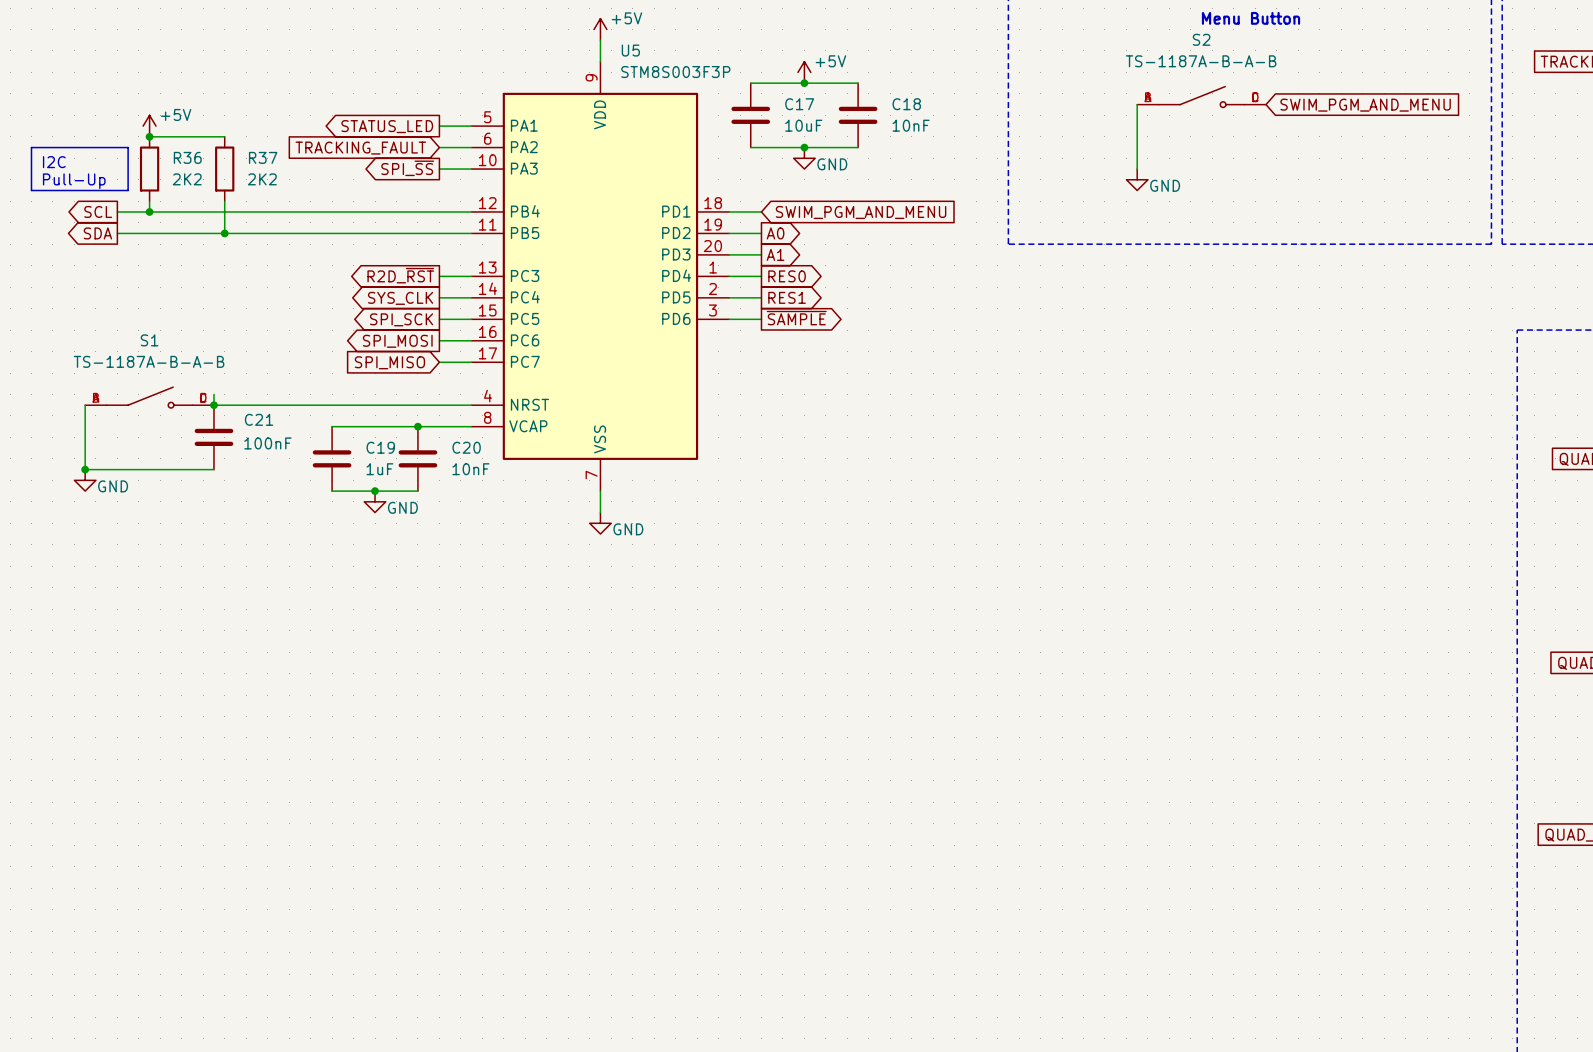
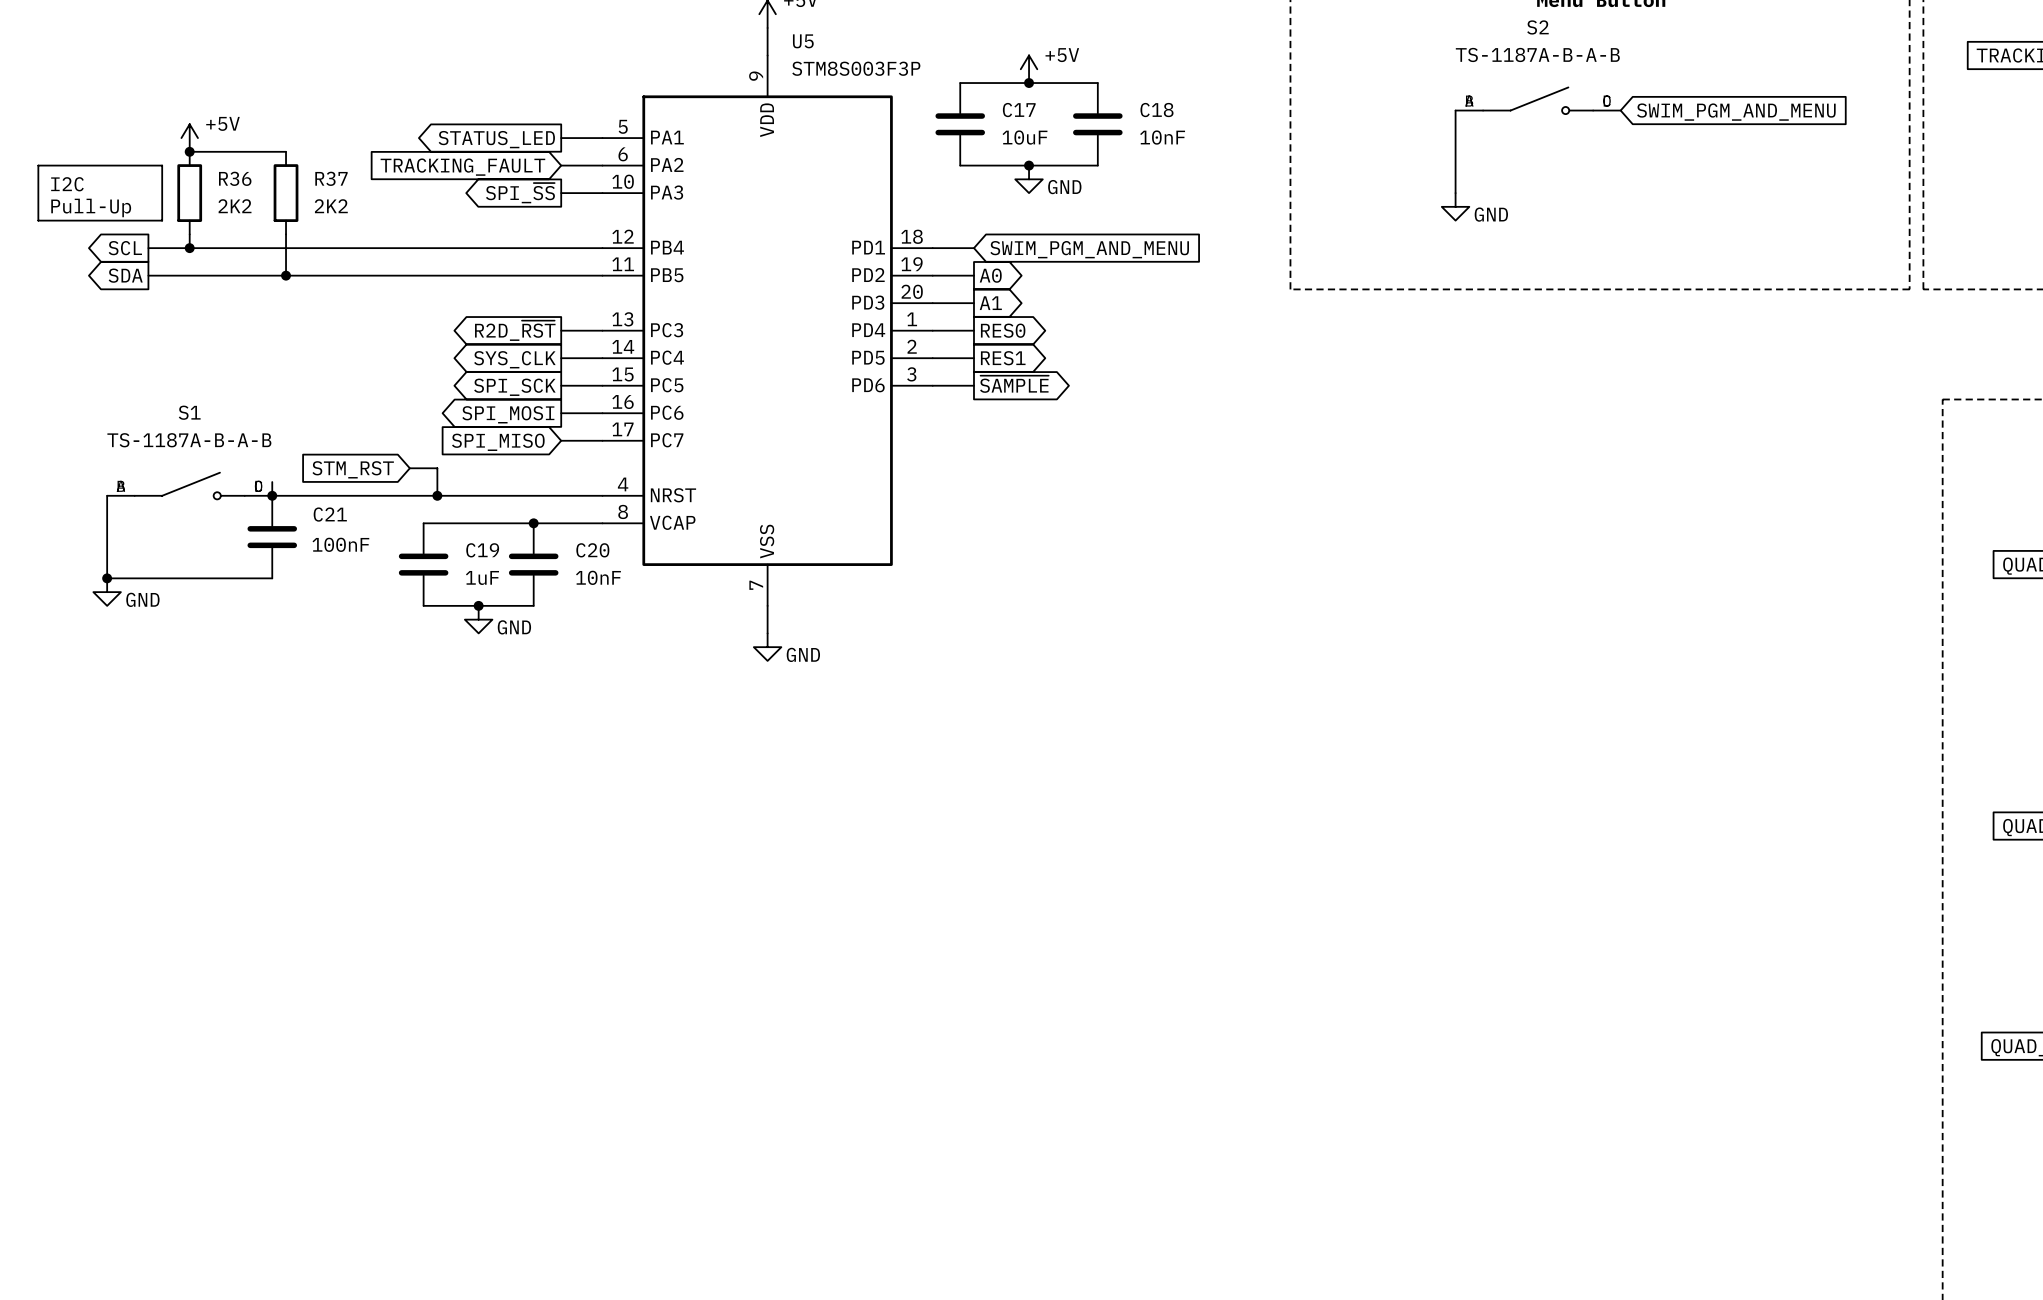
wire: none -> (409, 468) (437, 468) (437, 495)
global label: none -> STM_RST (353, 469)
junction: none -> (437, 495)

